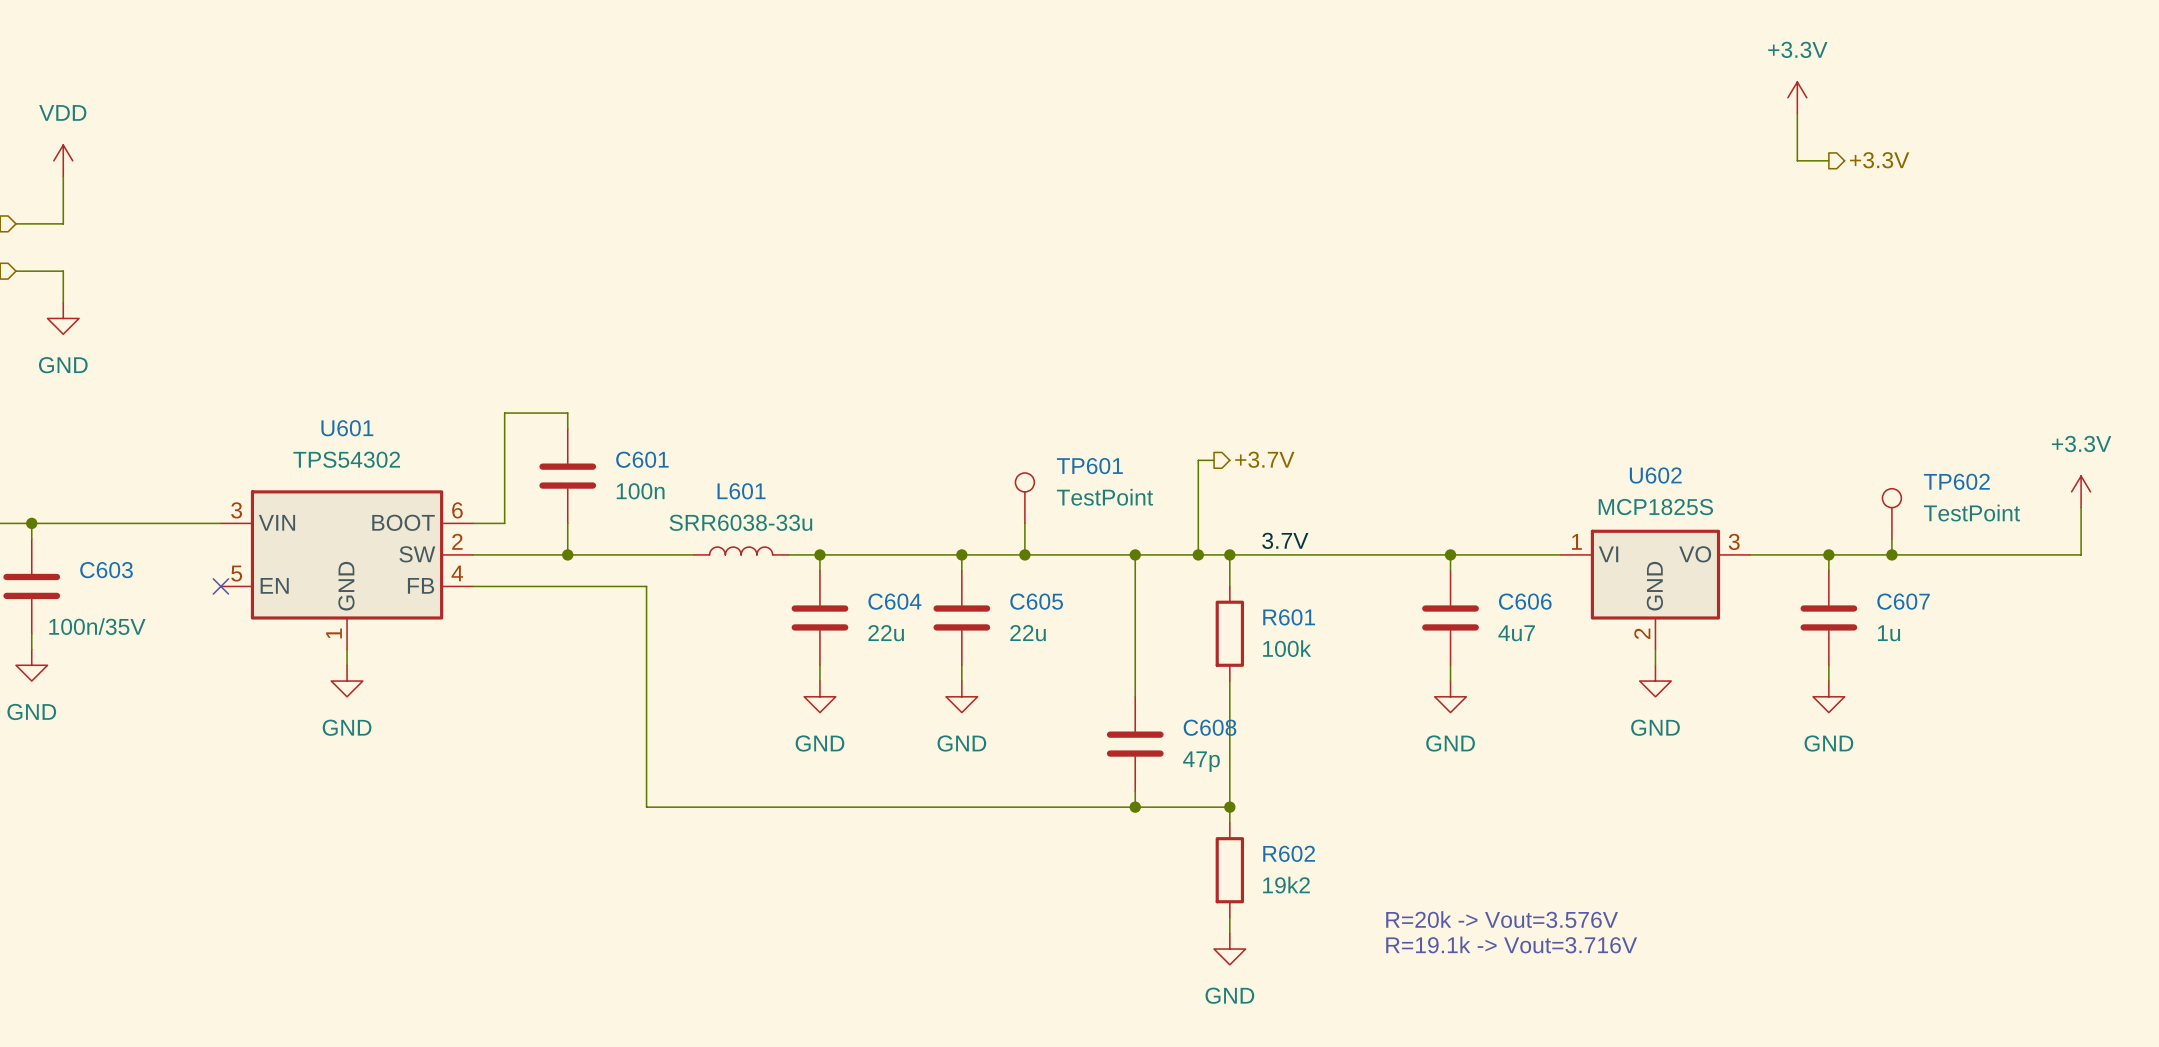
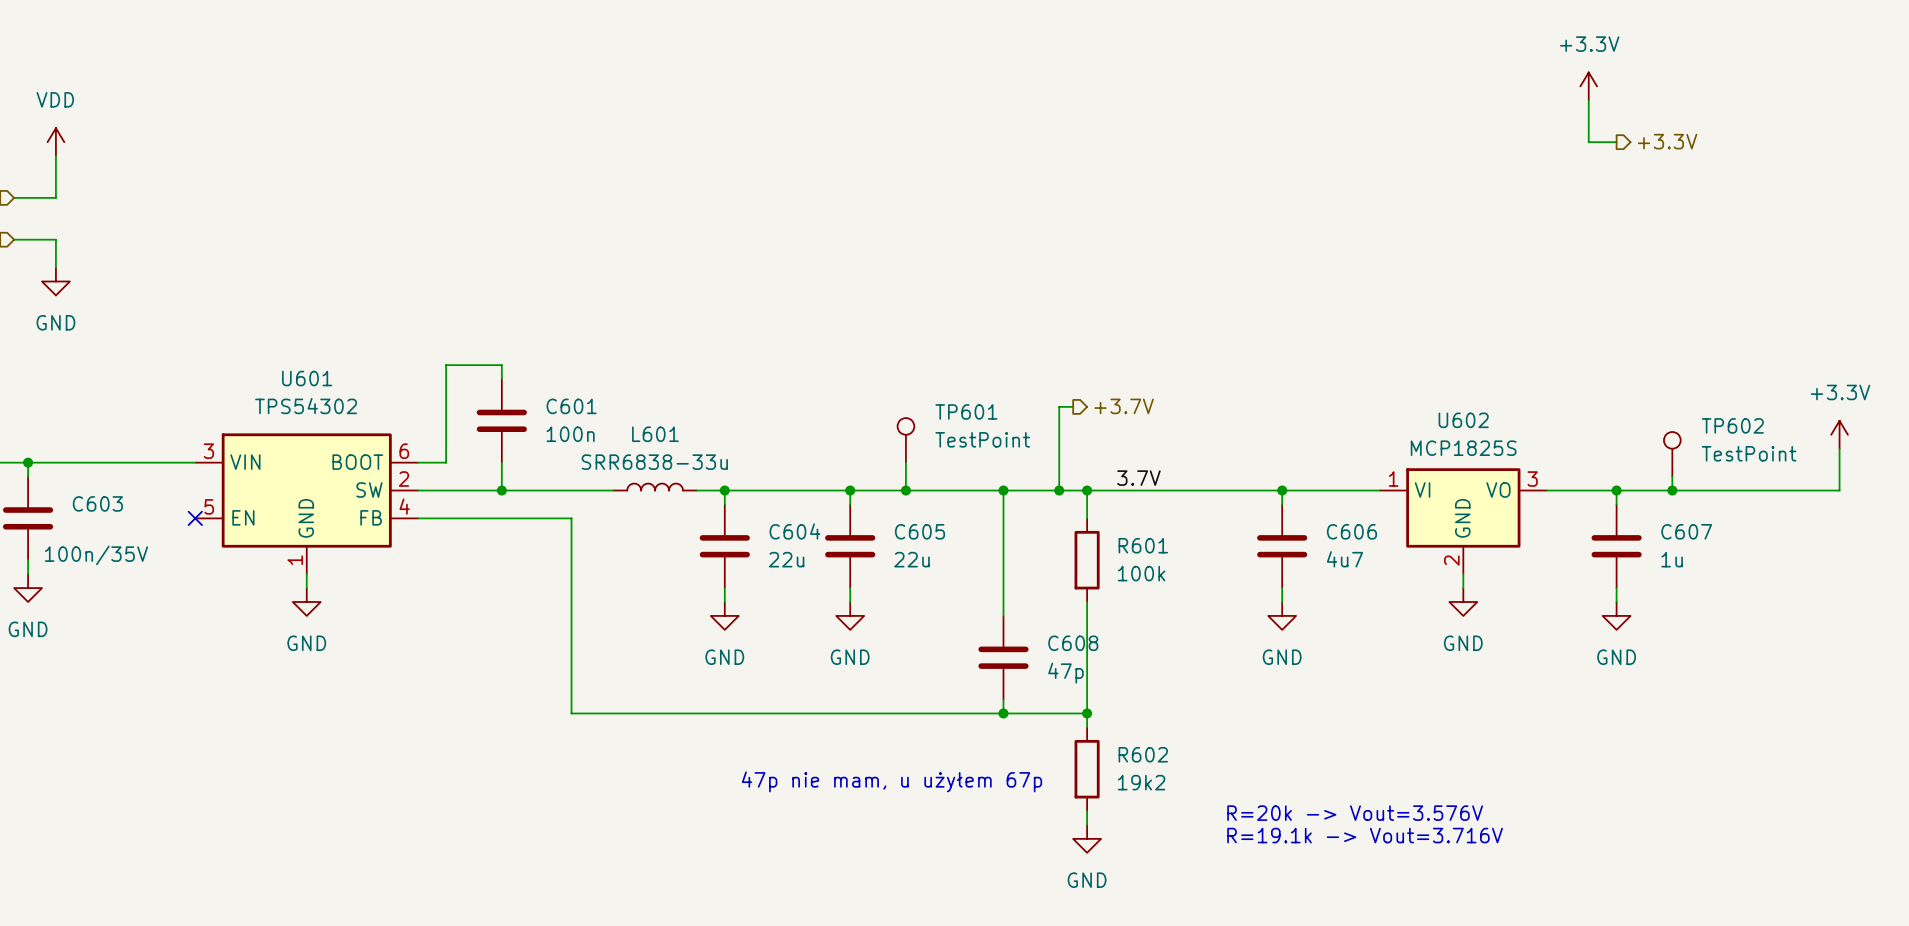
L601 value: SRR6038-33u (740, 522) -> SRR6838-33u (654, 462)
text: none -> 47p nie mam, u użyłem 67p (892, 781)

